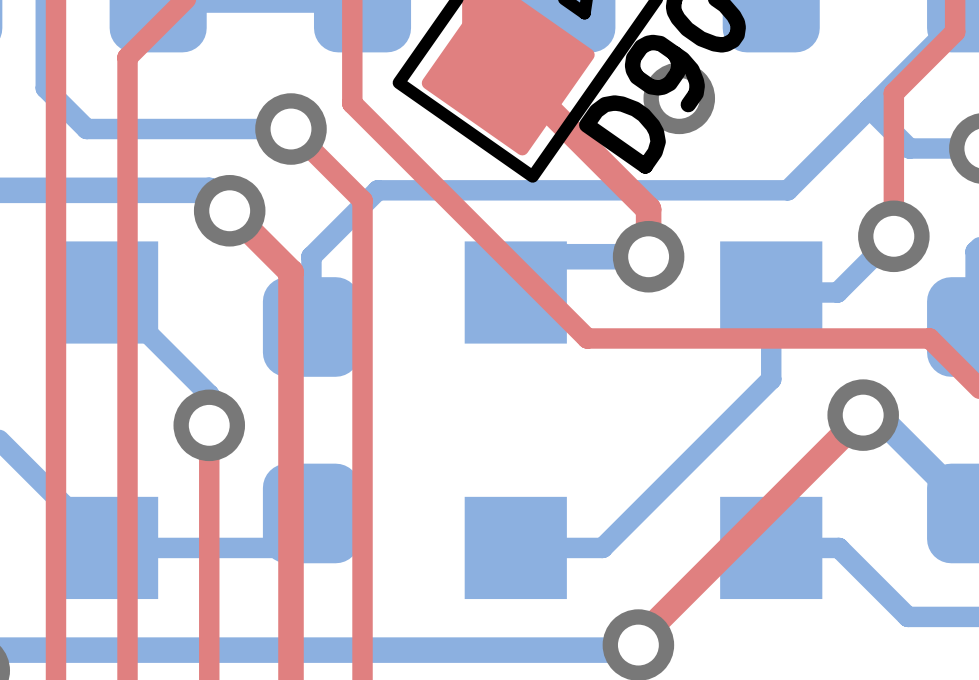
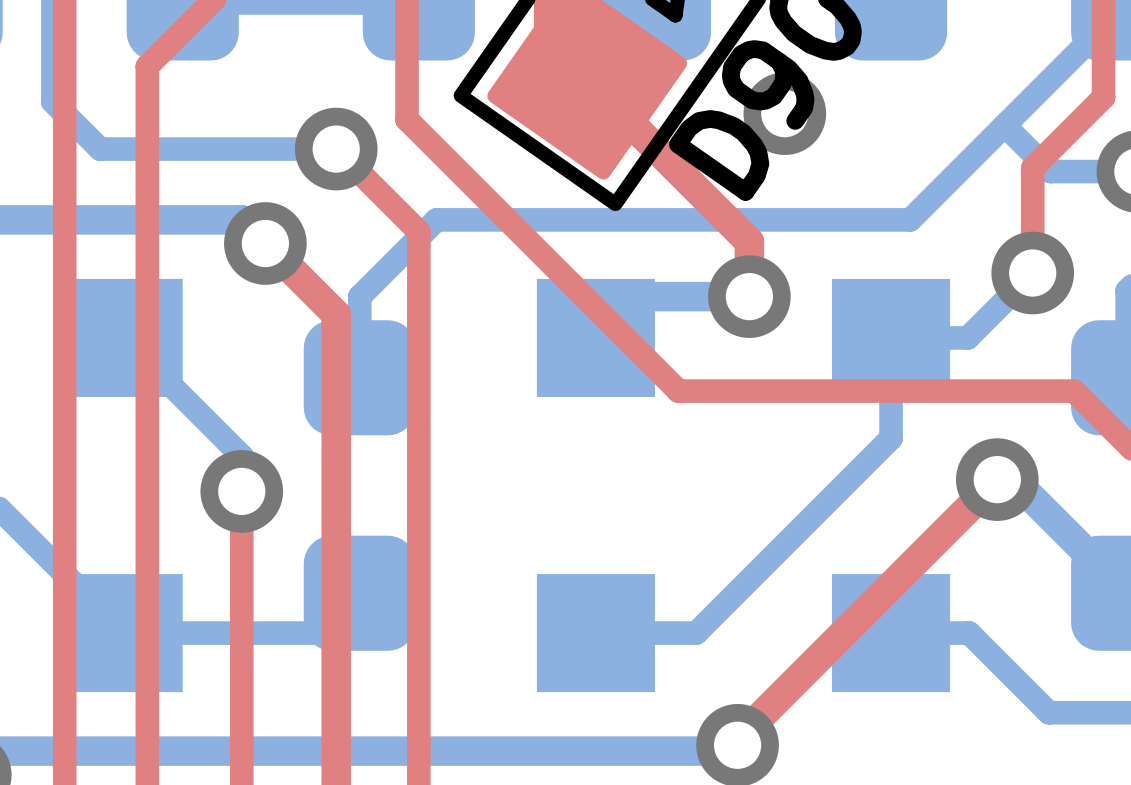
top track: (955, 31) (893, 93) (893, 145) -> (1103, 36) (1103, 97) (1032, 168)

